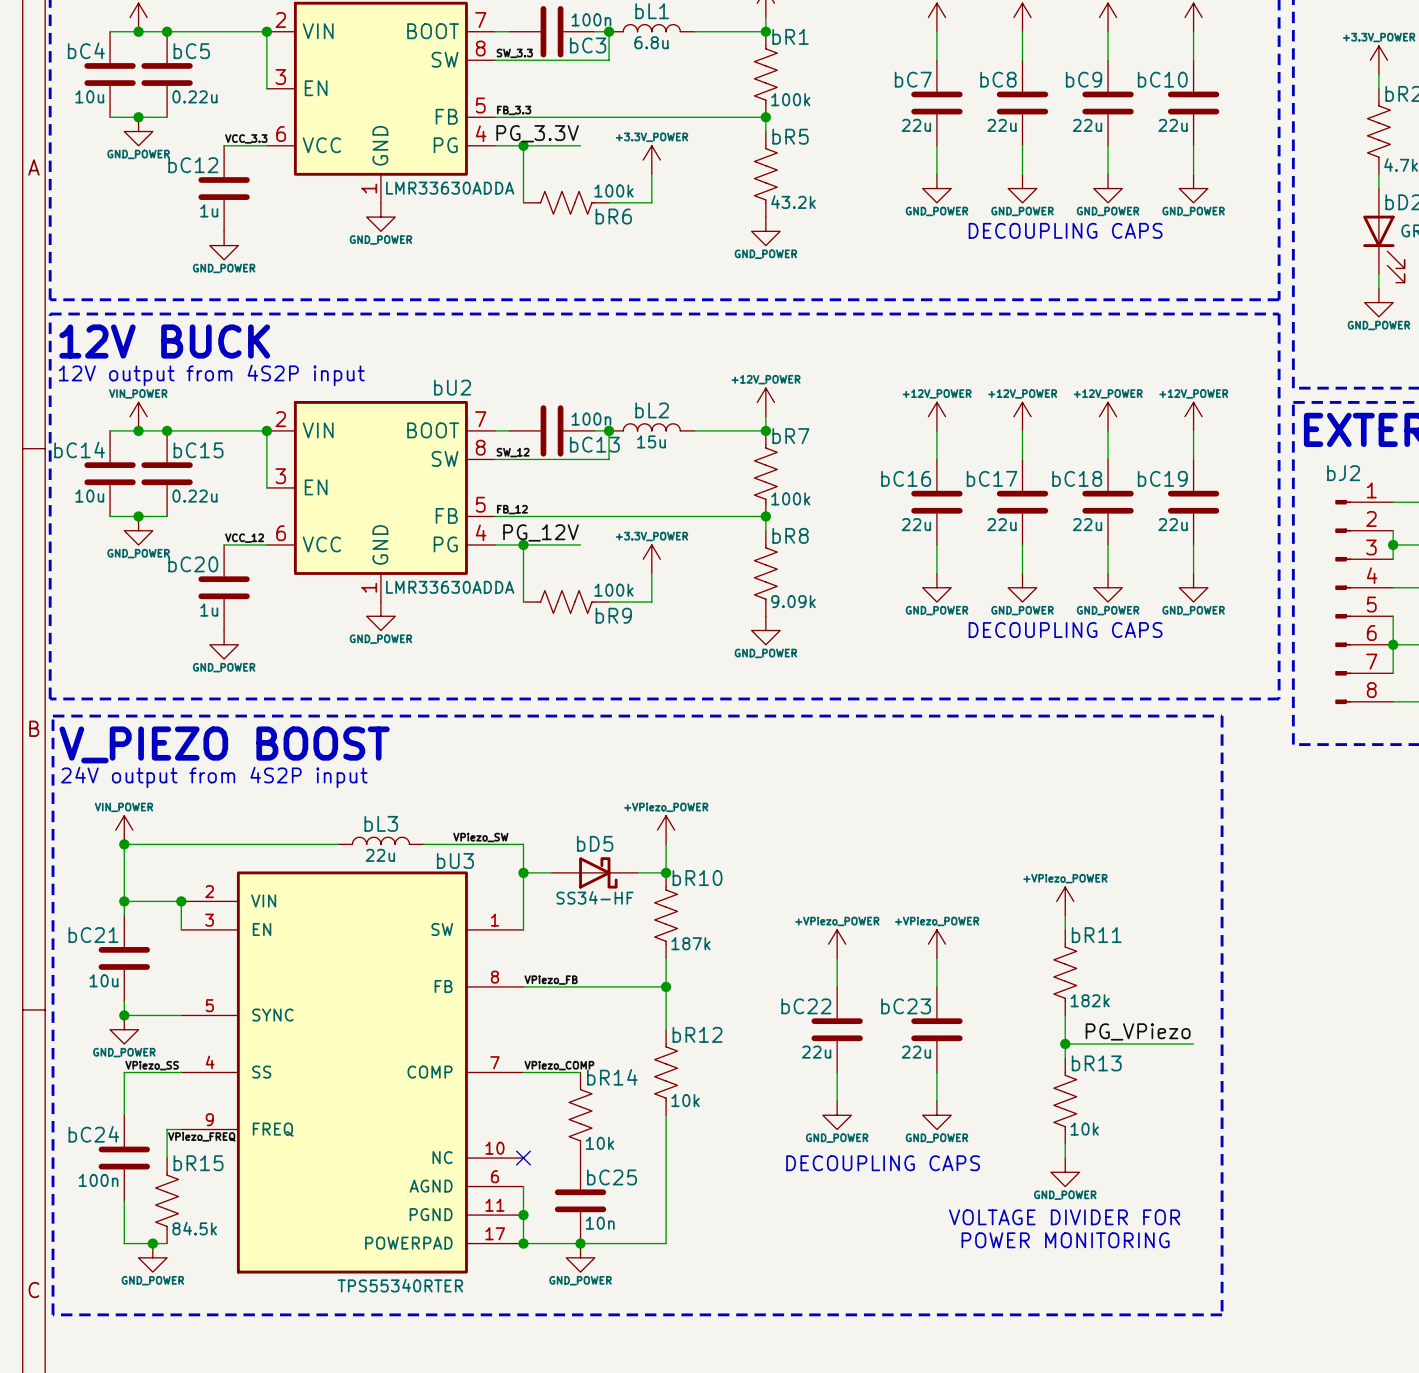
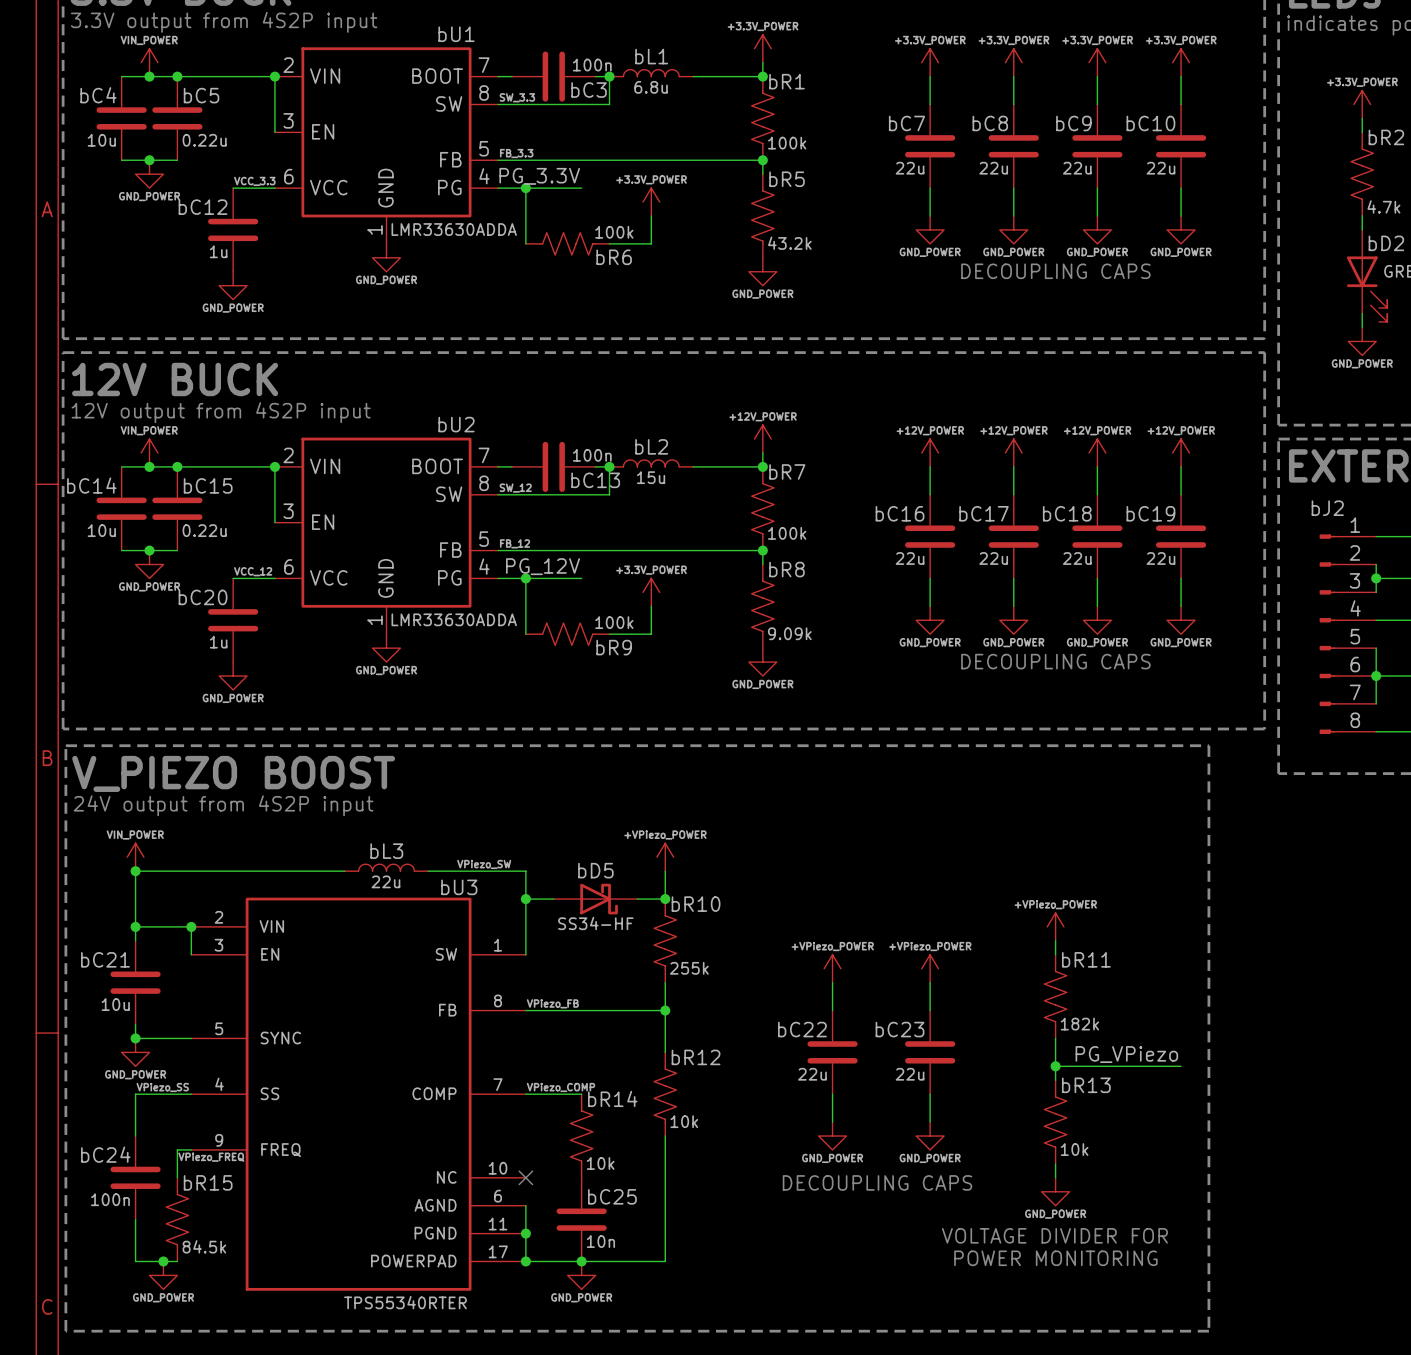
bR10 value: 187k (690, 943) -> 255k (689, 968)

